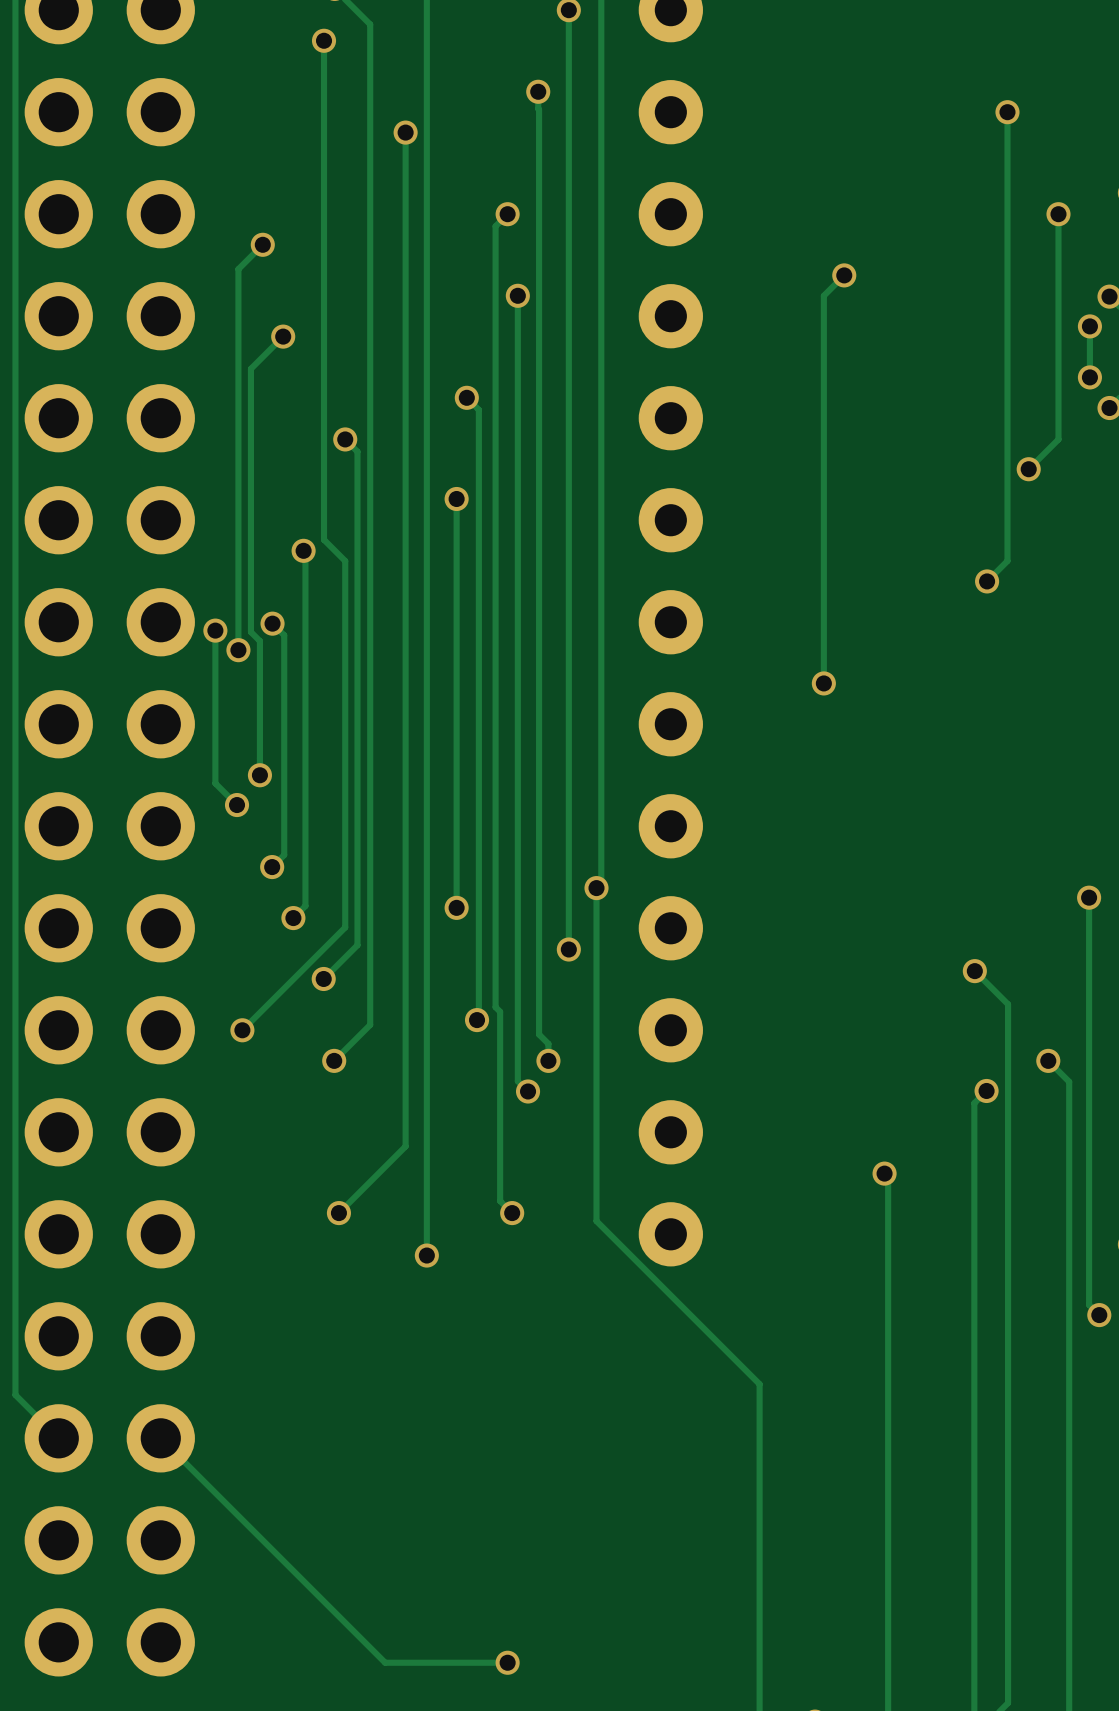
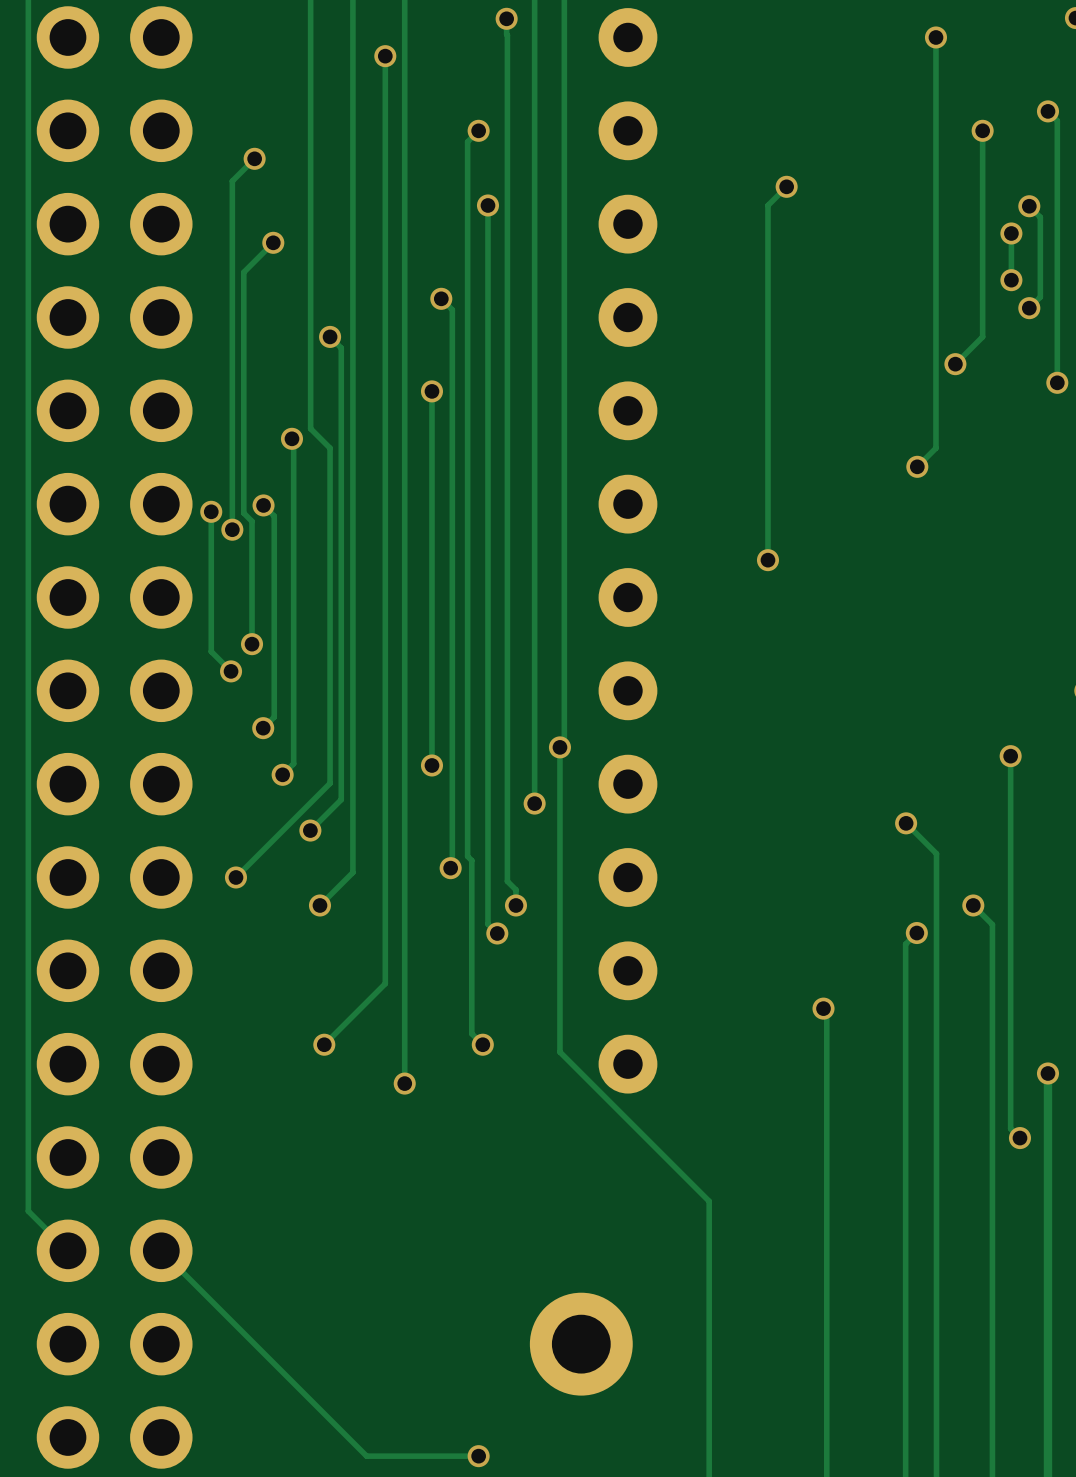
part: none -> (581, 1344)

